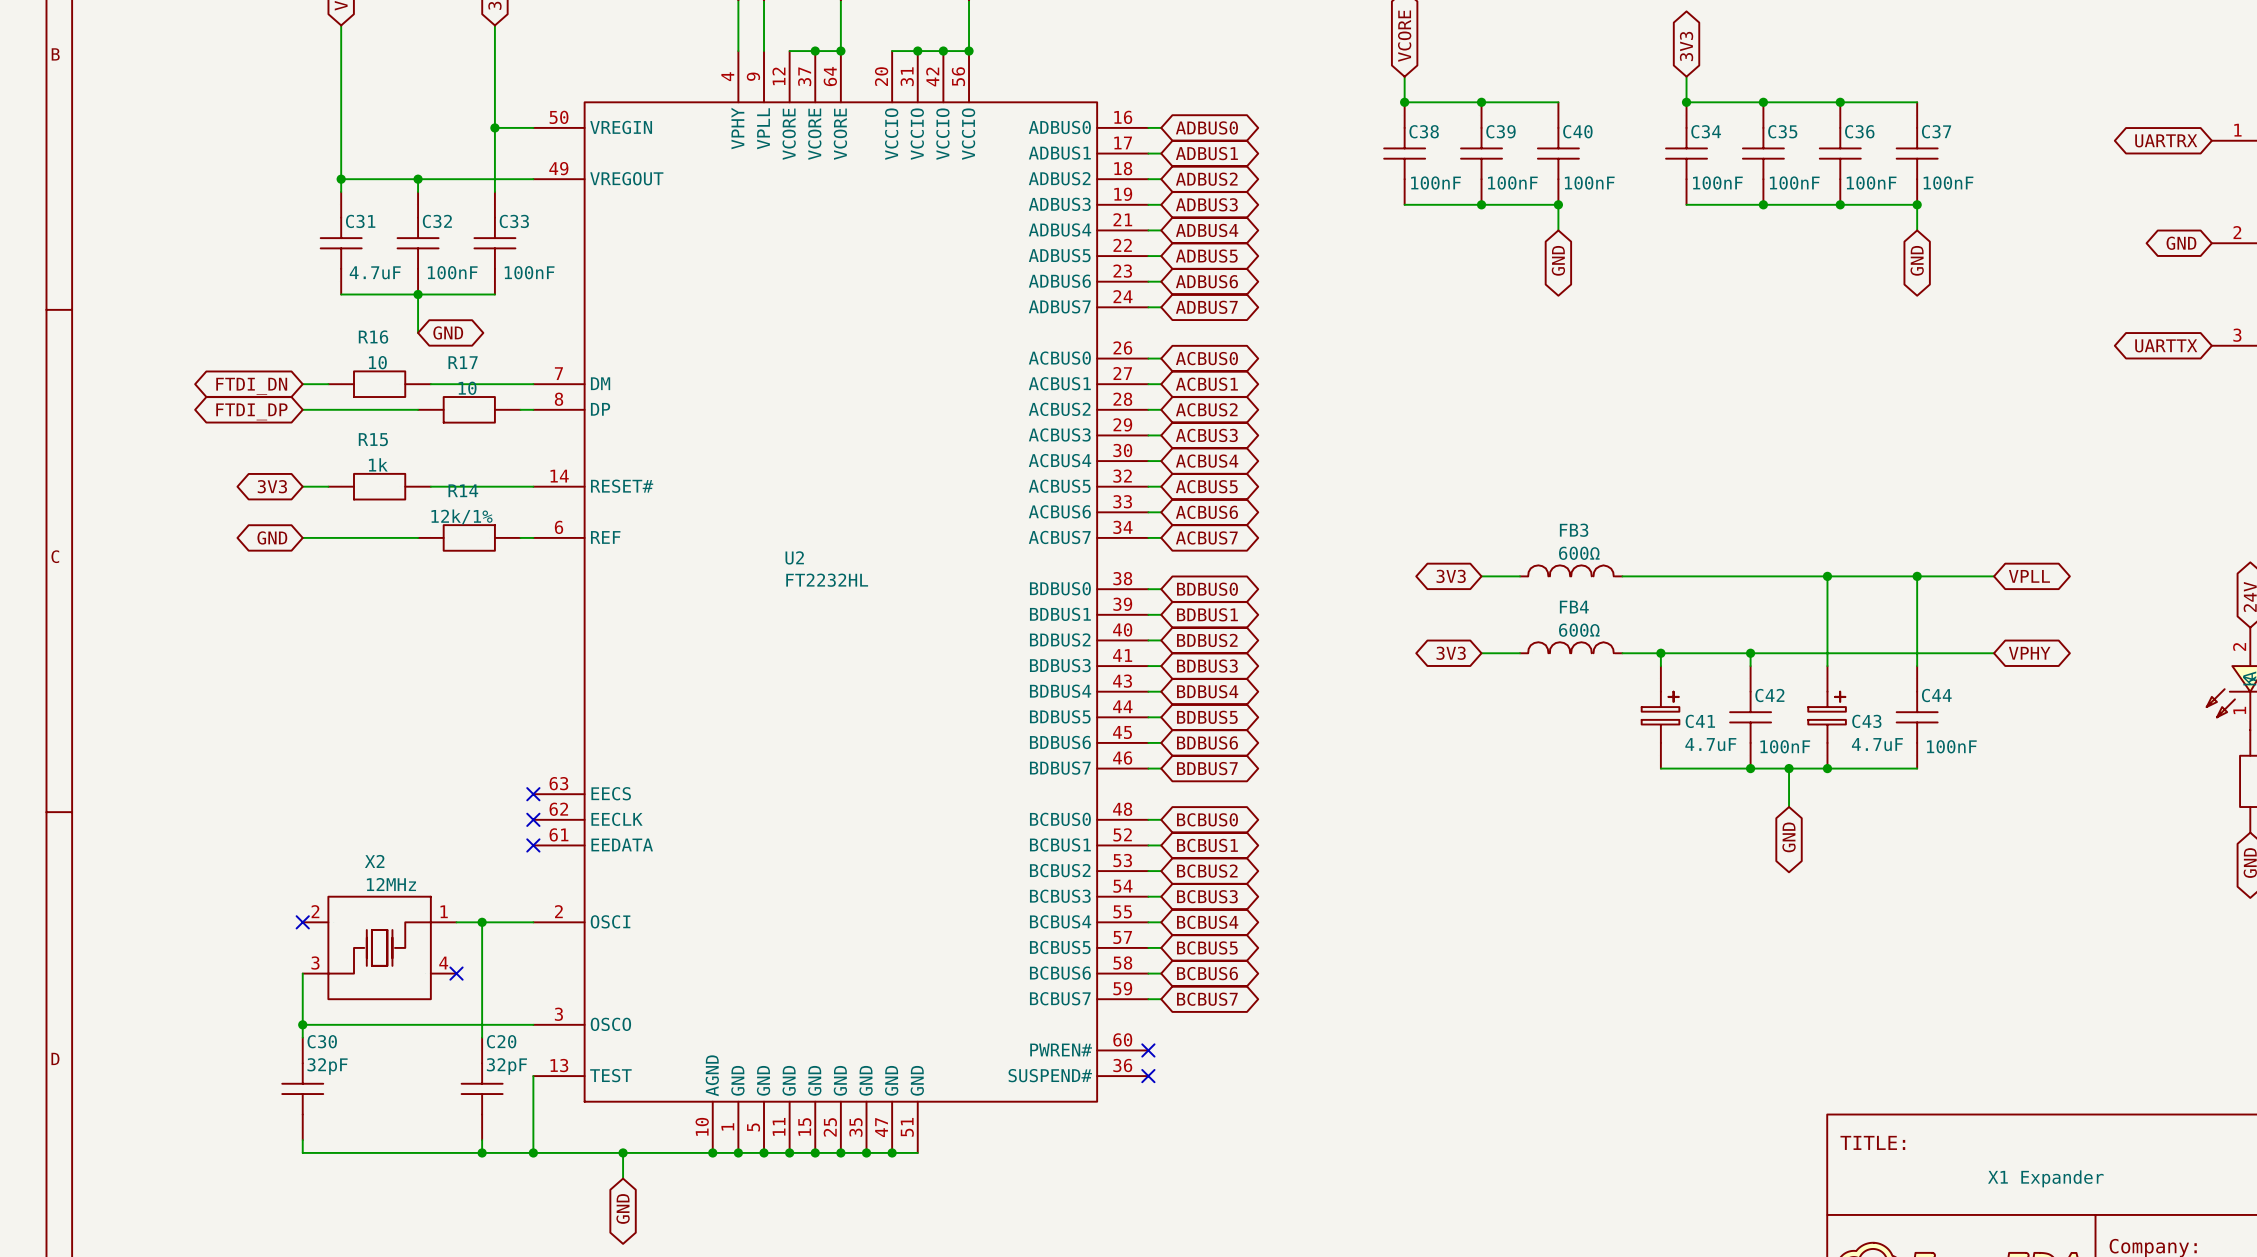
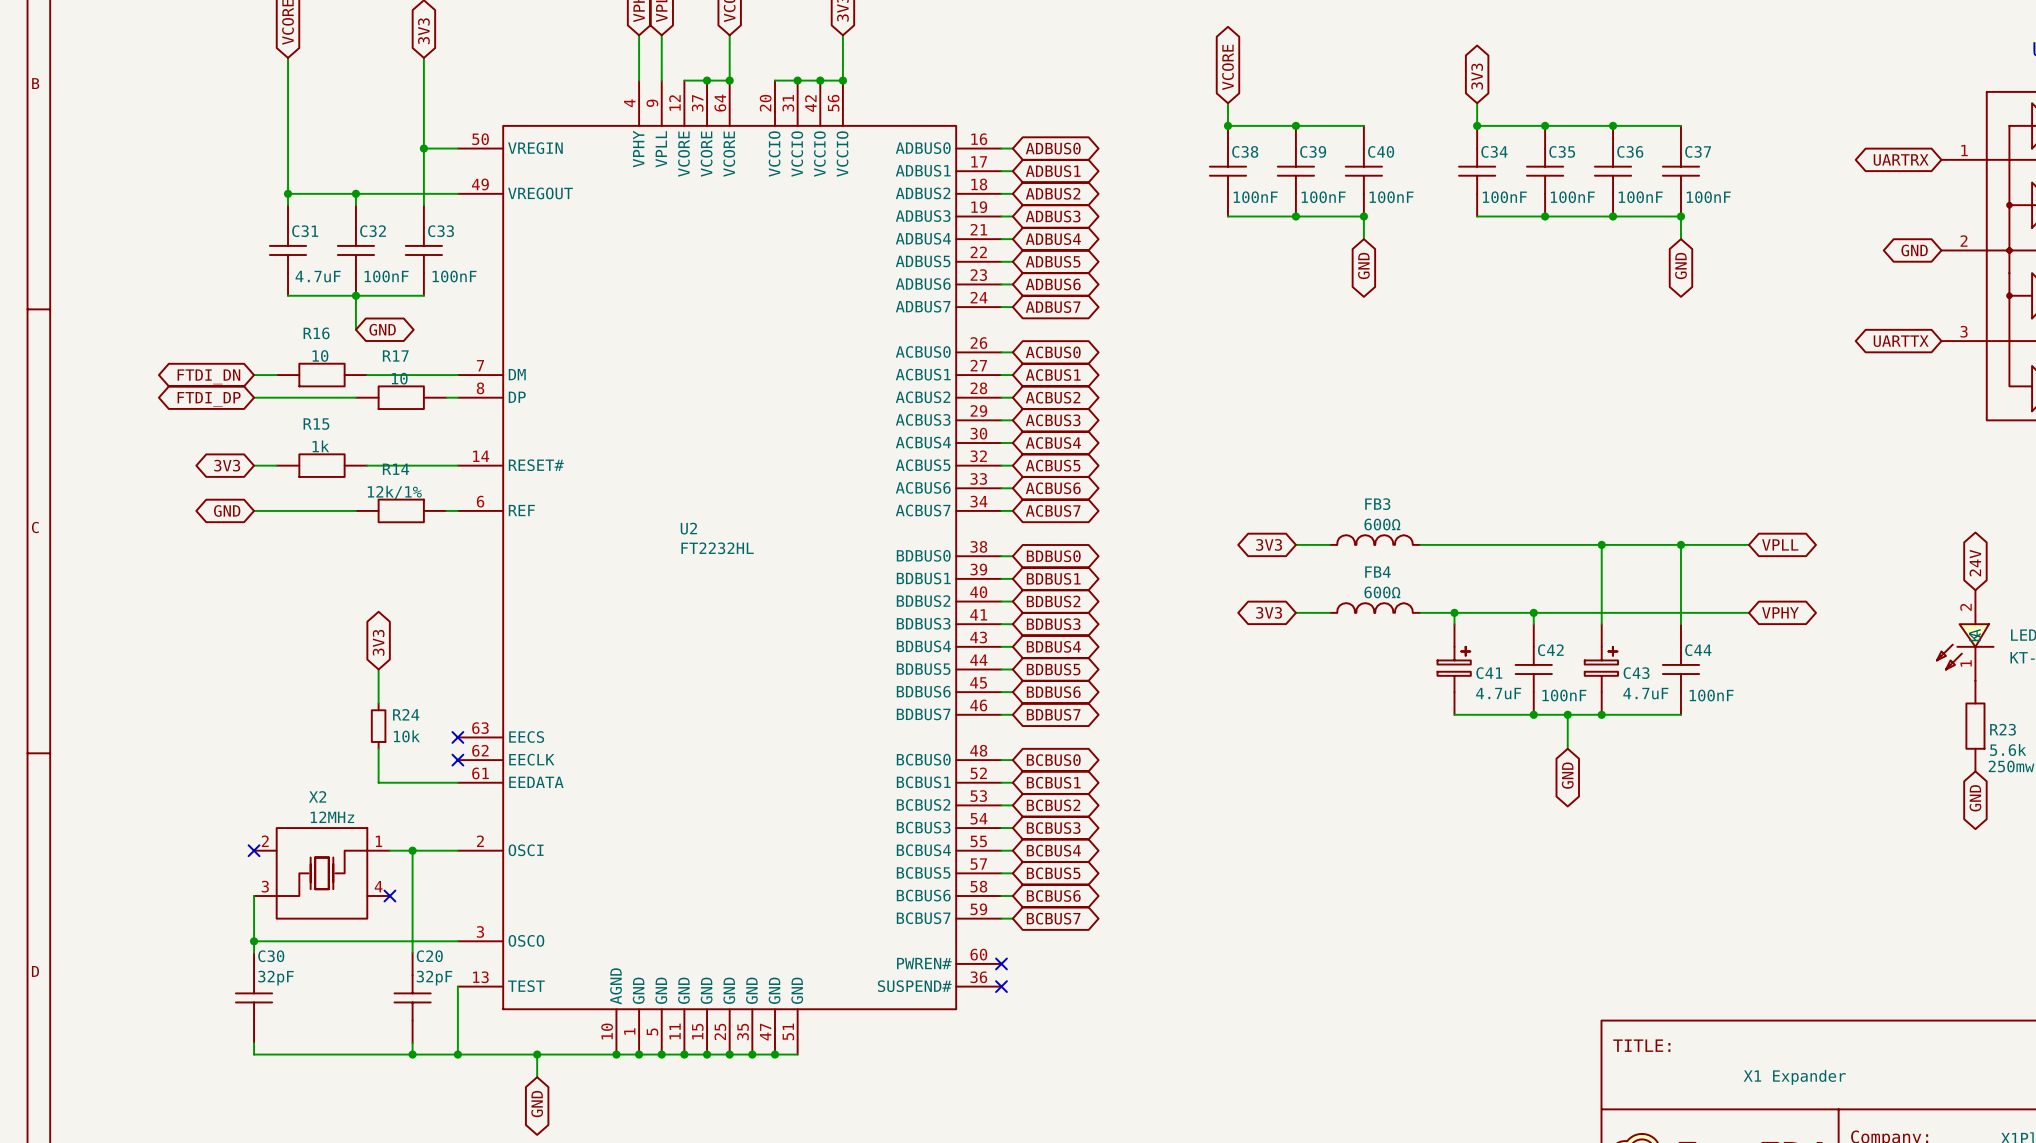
global label: none -> 3V3 (378, 642)
wire: none -> (378, 669) (378, 703)
R24: none -> 10k (378, 726)
wire: none -> (378, 748) (378, 782) (457, 782)
no-connect mark: (533, 845) -> none

